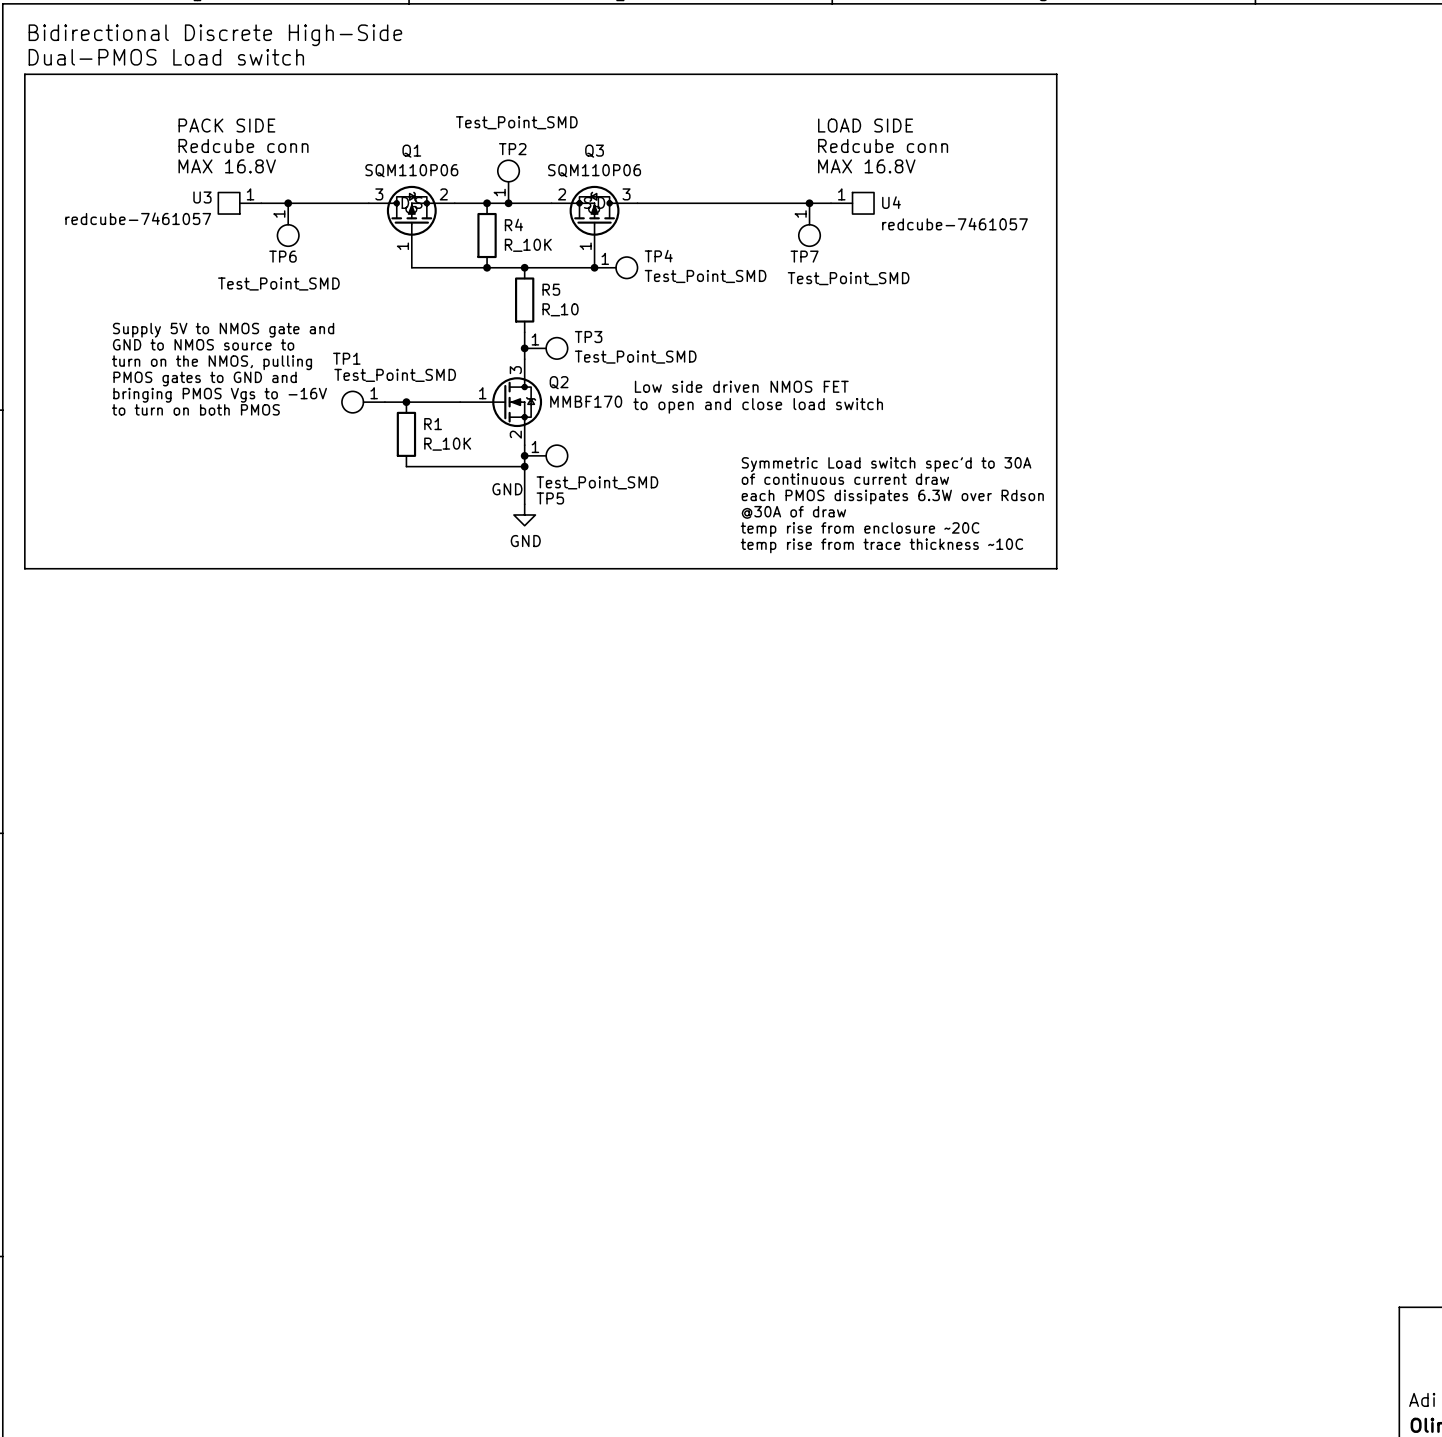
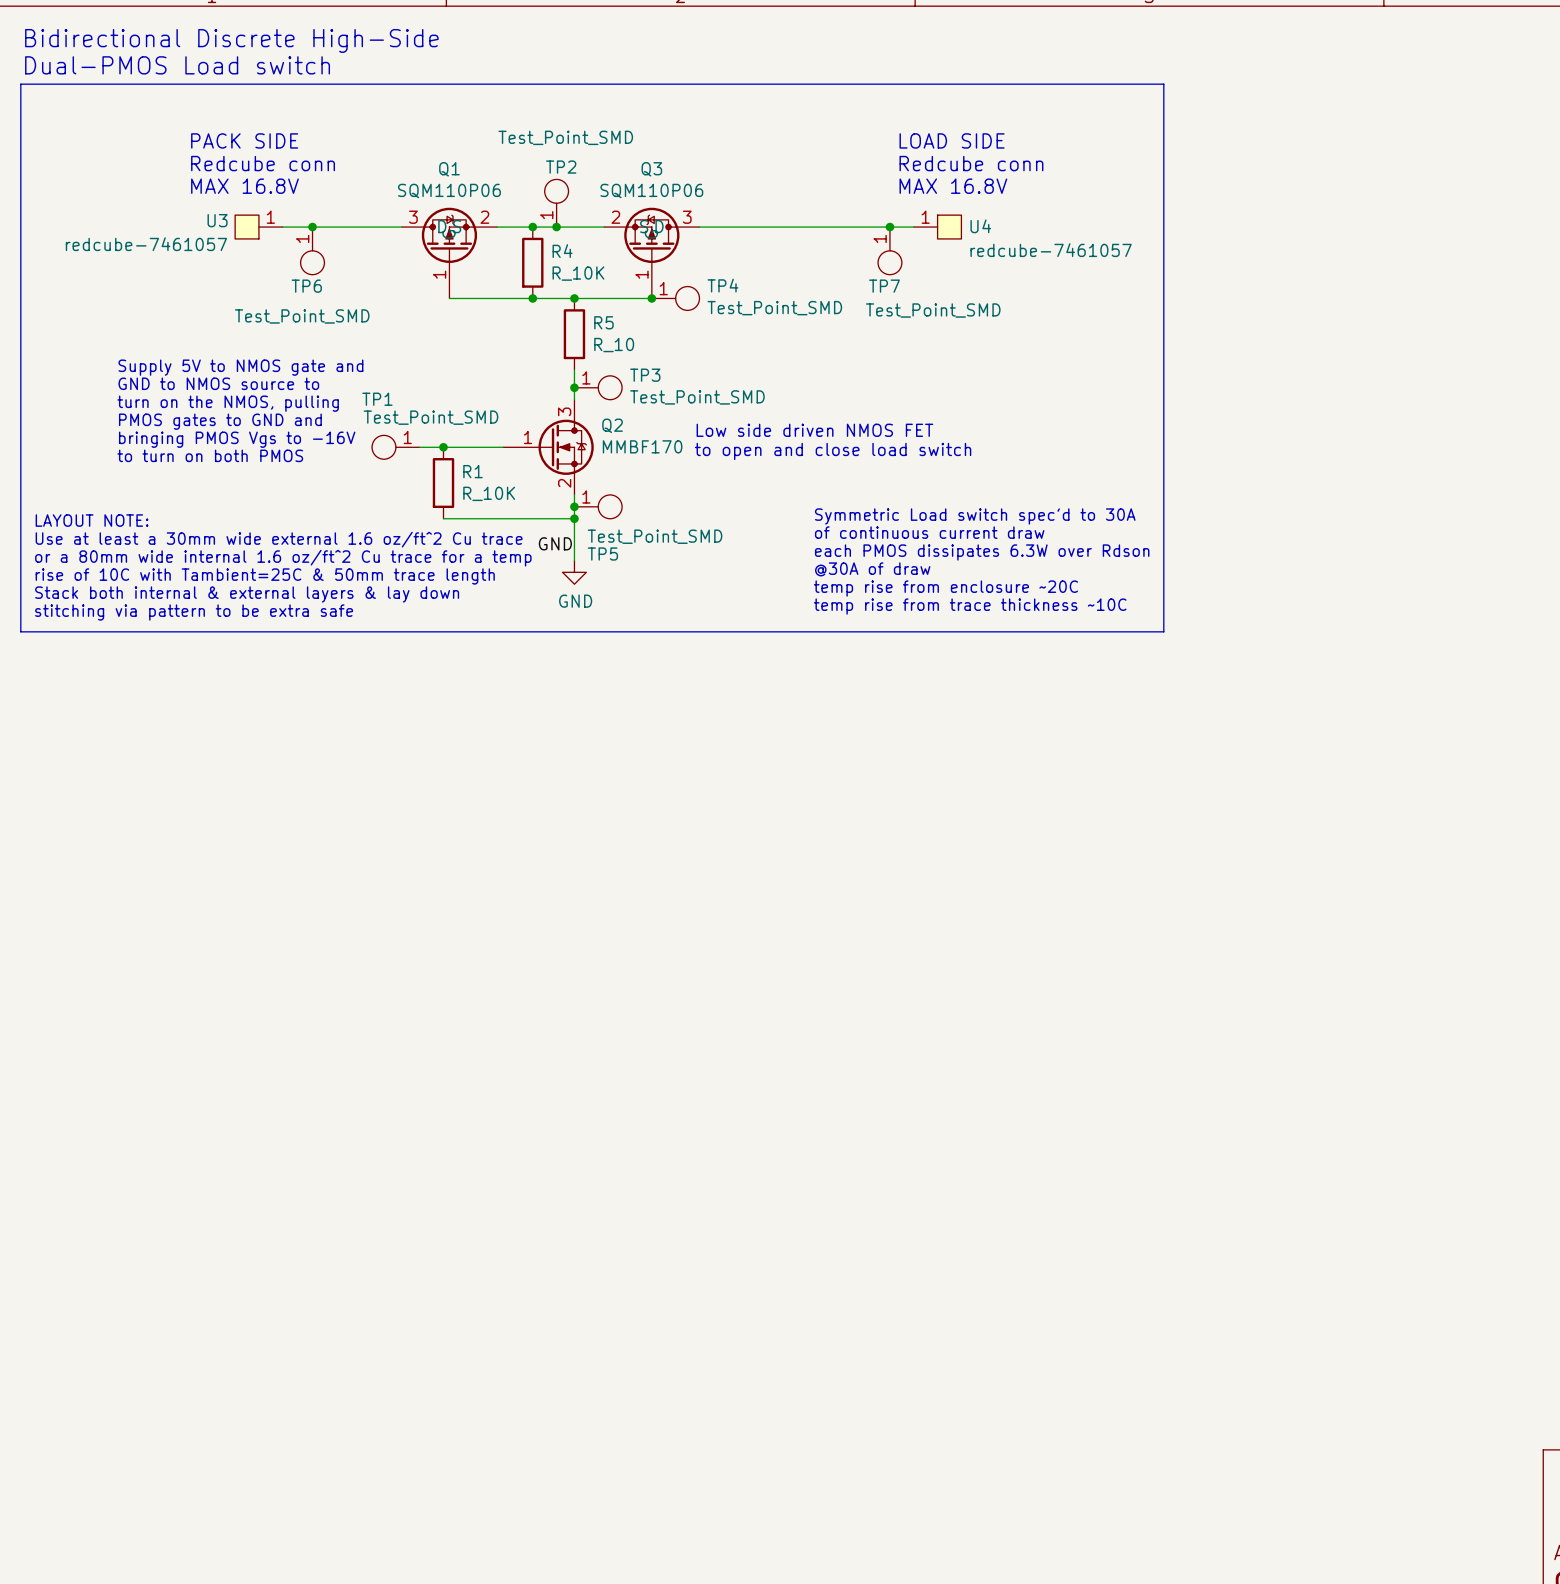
text: none -> LAYOUT NOTE: (92, 520)
text: none -> Use at least a 30mm wide external 1.6 oz/ft^2 Cu trace (279, 539)
text: none -> or a 80mm wide internal 1.6 oz/ft^2 Cu trace for a temp (283, 558)
text: none -> rise of 10C with Tambient=25C & 50mm trace length (265, 576)
text: none -> Stack both internal & external layers & lay down (247, 594)
text: none -> stitching via pattern to be extra safe (194, 612)

